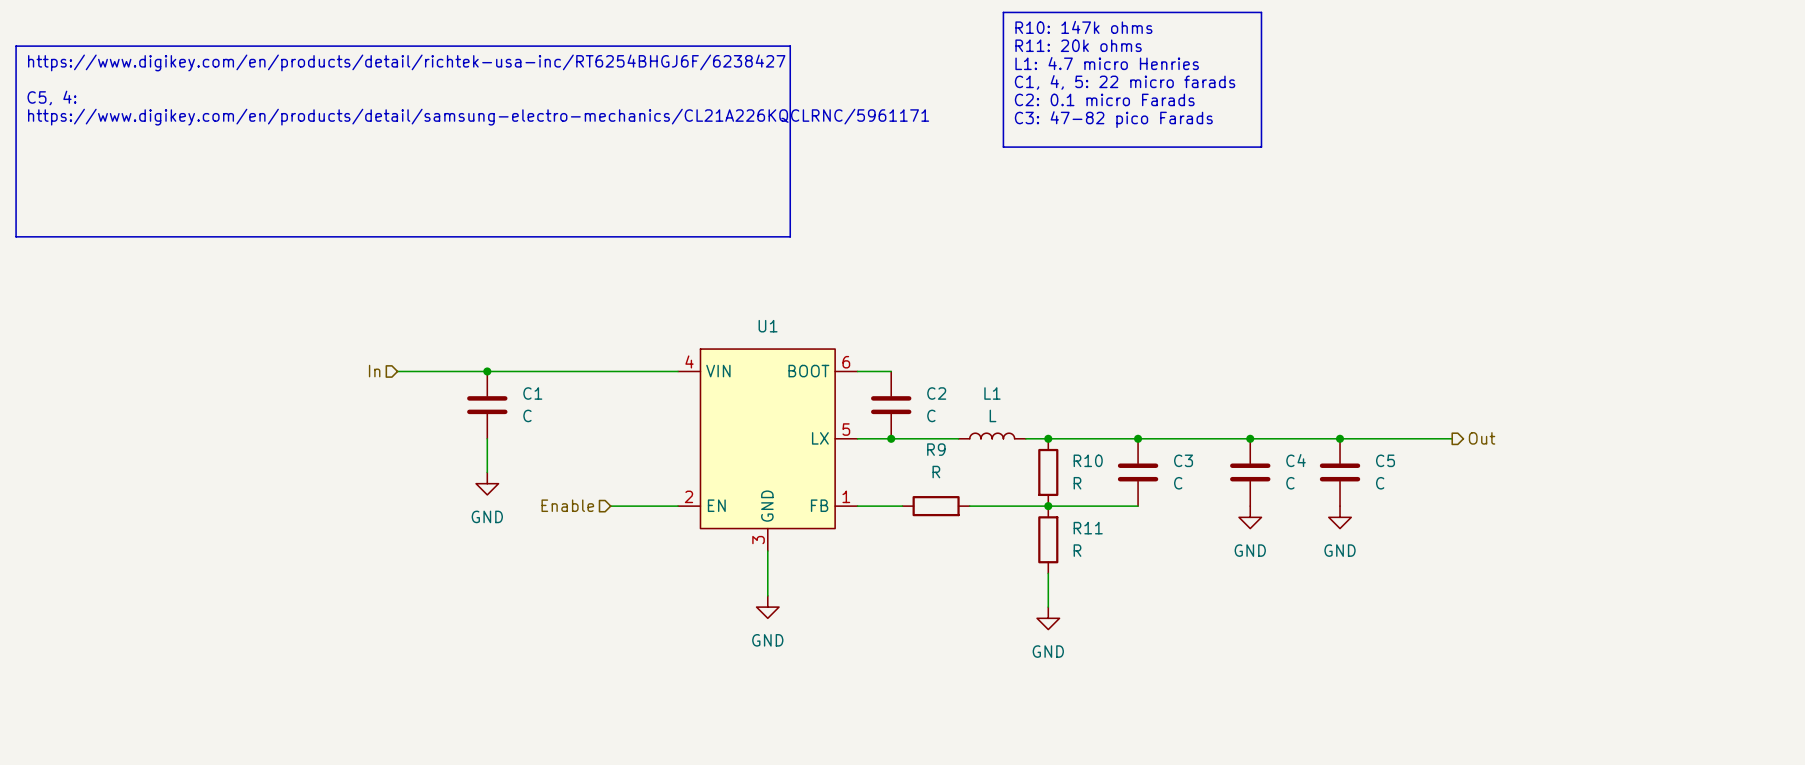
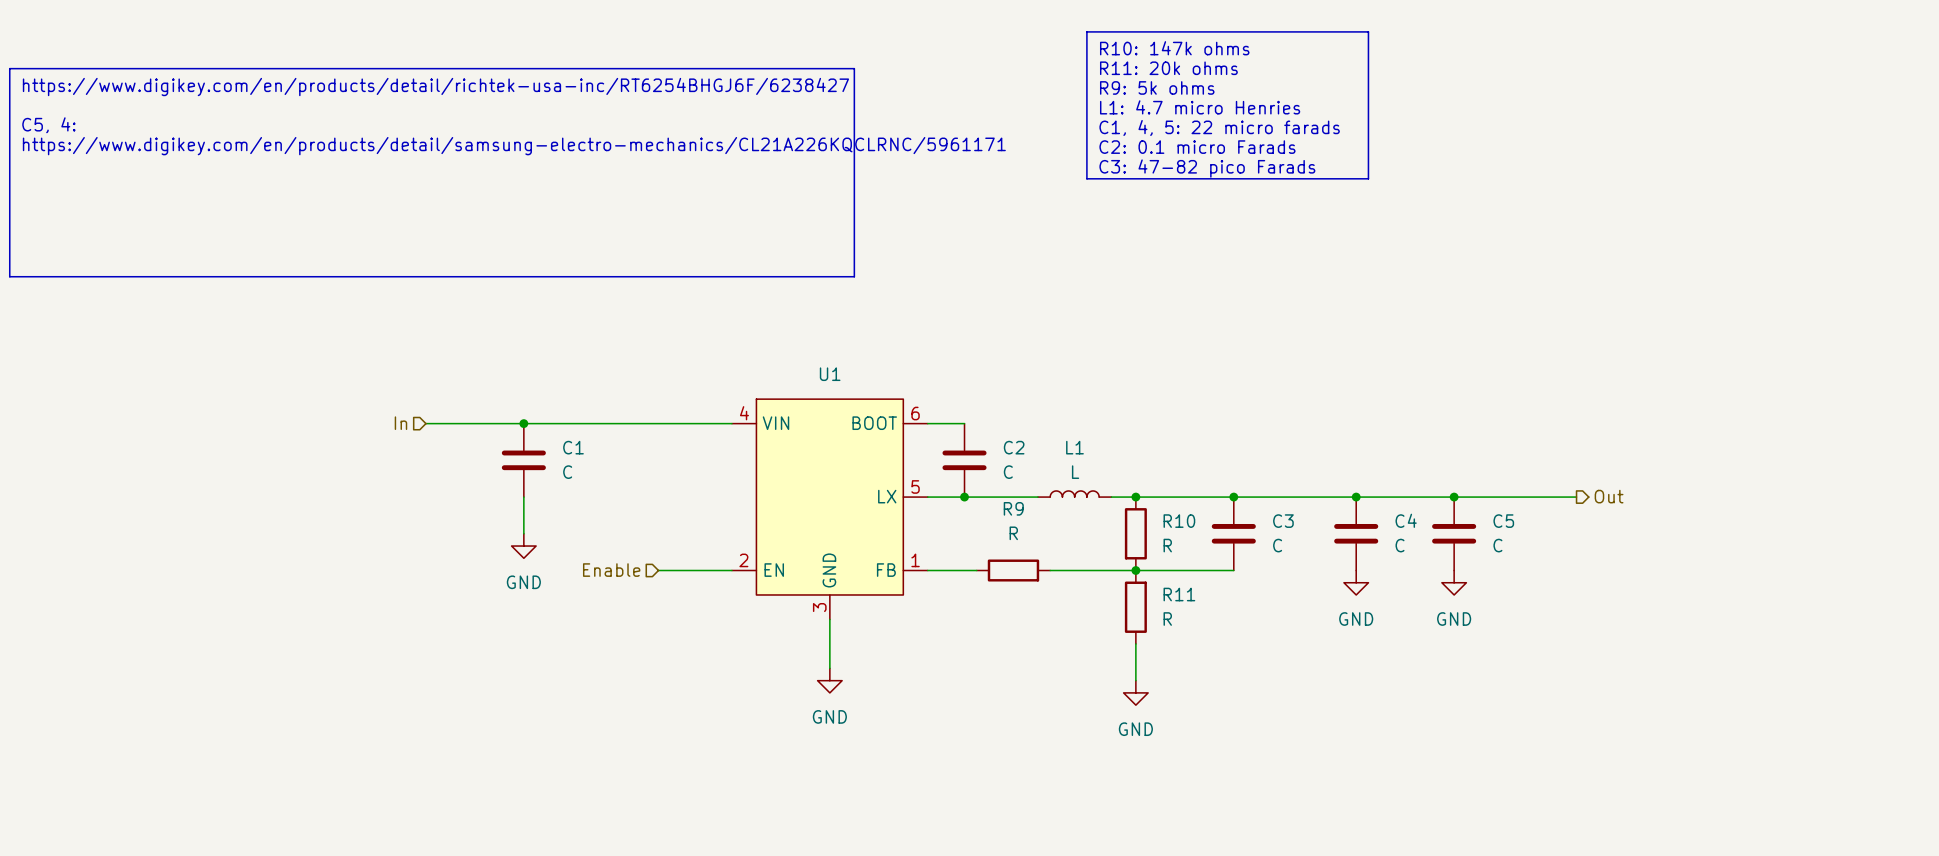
text: L1: 4.7 micro Henries (1107, 63) -> R9: 5k ohms (1157, 87)
text: C1, 4, 5: 22 micro farads (1125, 82) -> L1: 4.7 micro Henries (1200, 107)
text: C2: 0.1 micro Farads (1104, 99) -> C1, 4, 5: 22 micro farads (1219, 127)
text: C3: 47-82 pico Farads (1113, 119) -> C2: 0.1 micro Farads (1197, 147)
text: none -> C3: 47-82 pico Farads (1207, 168)

